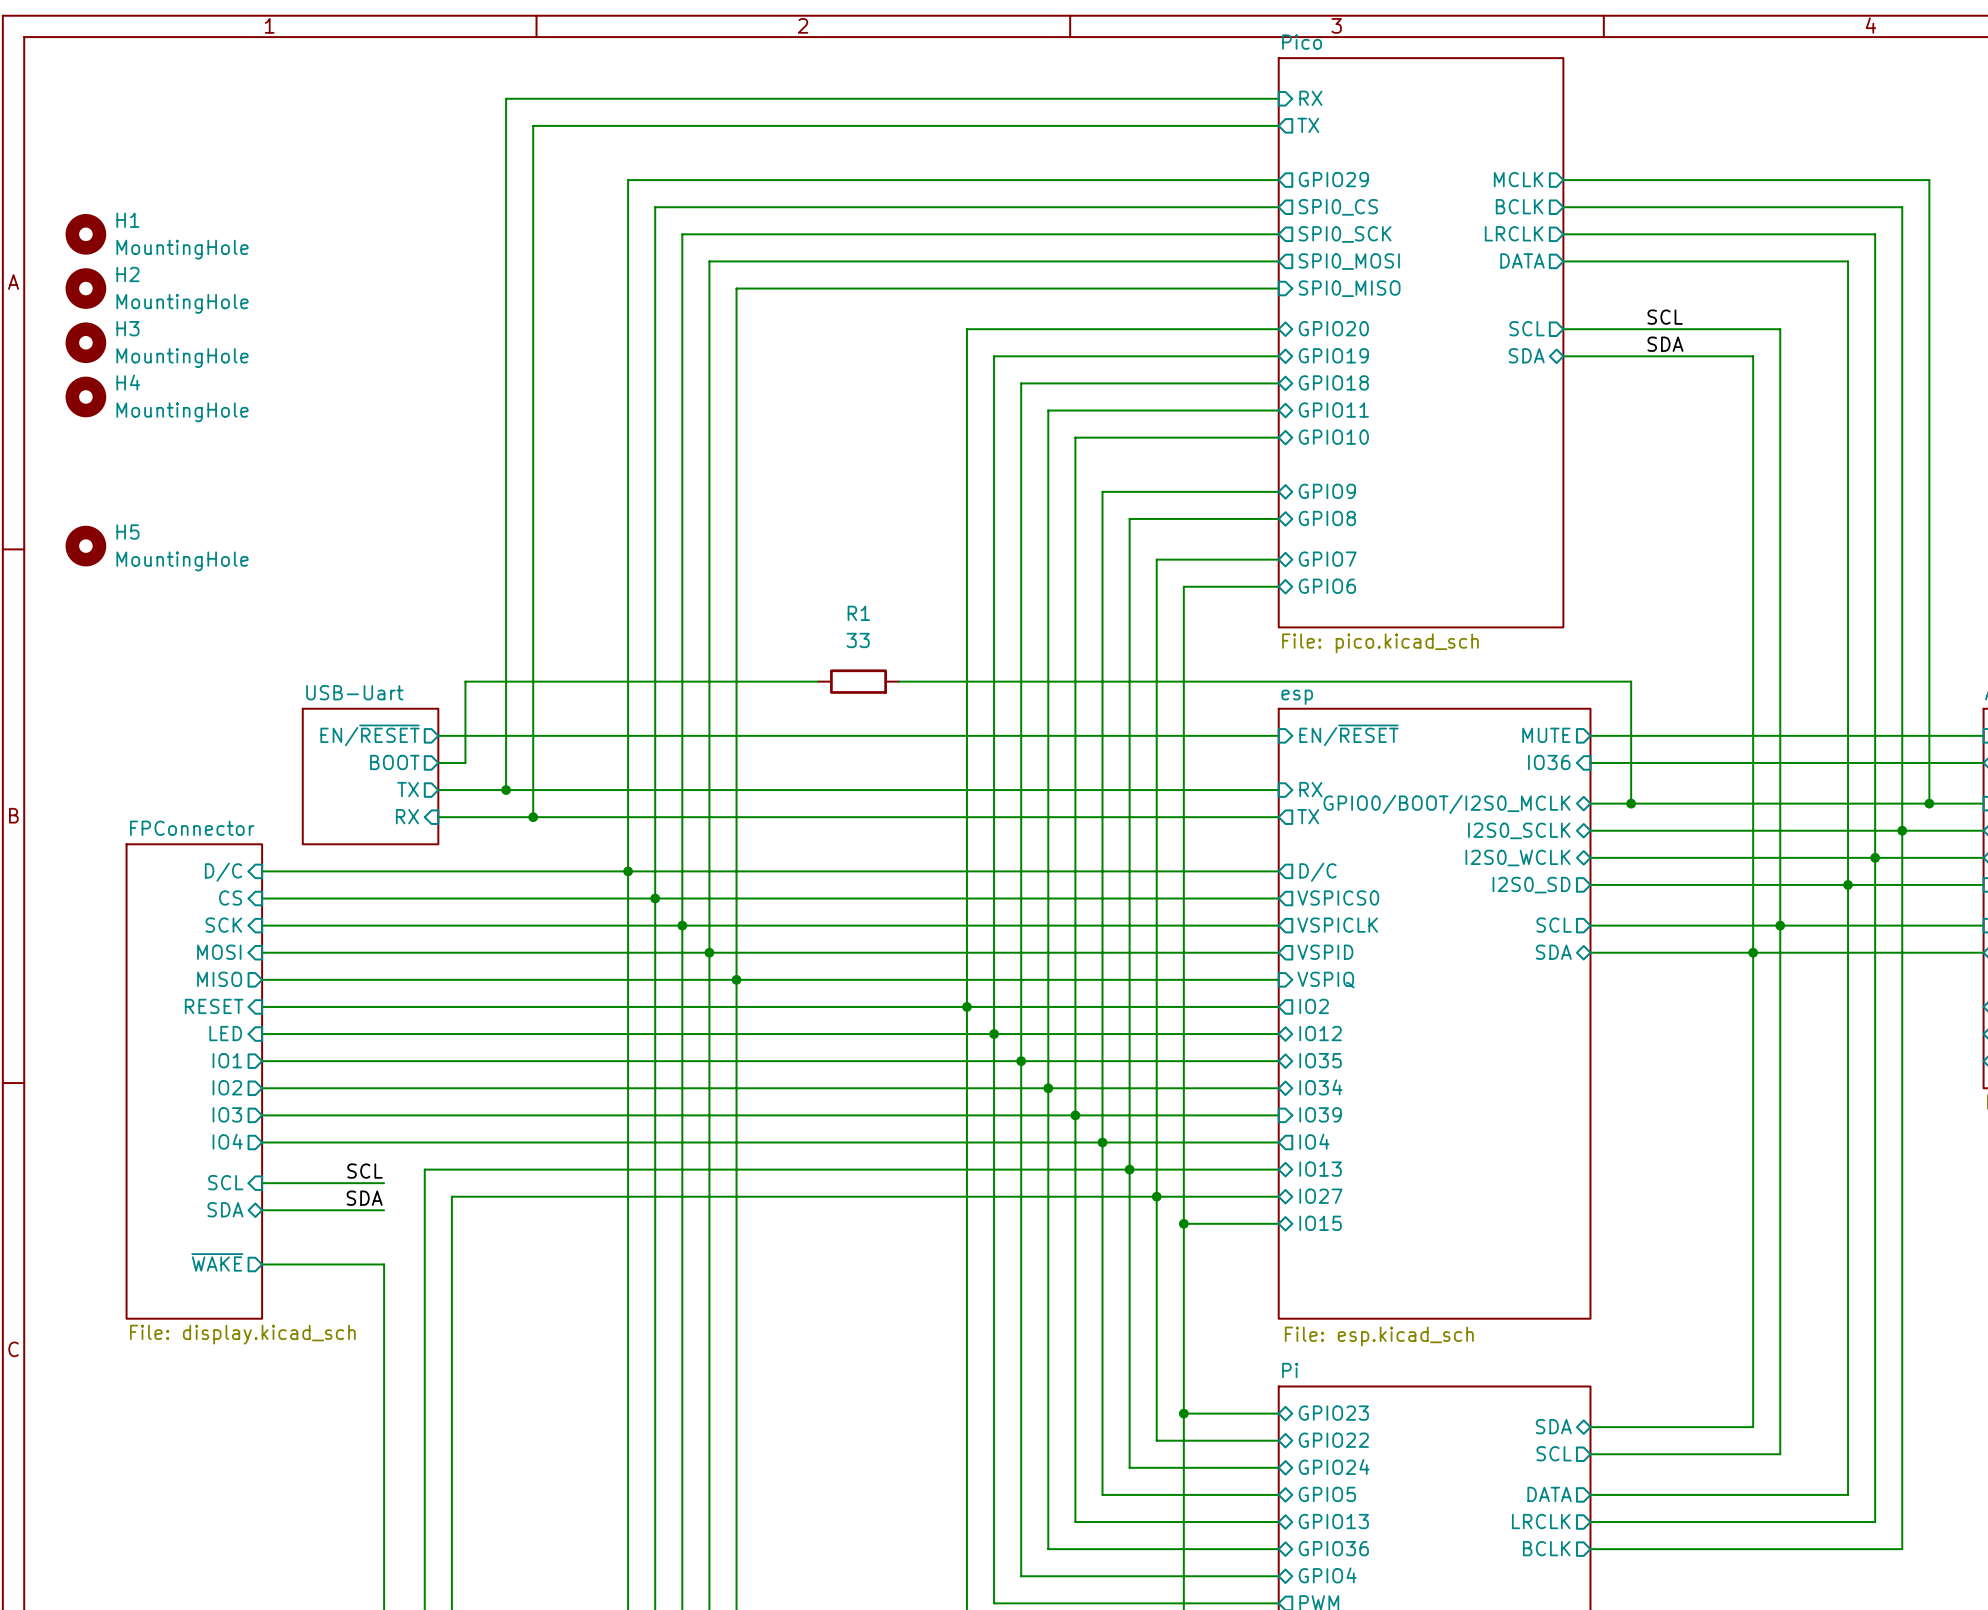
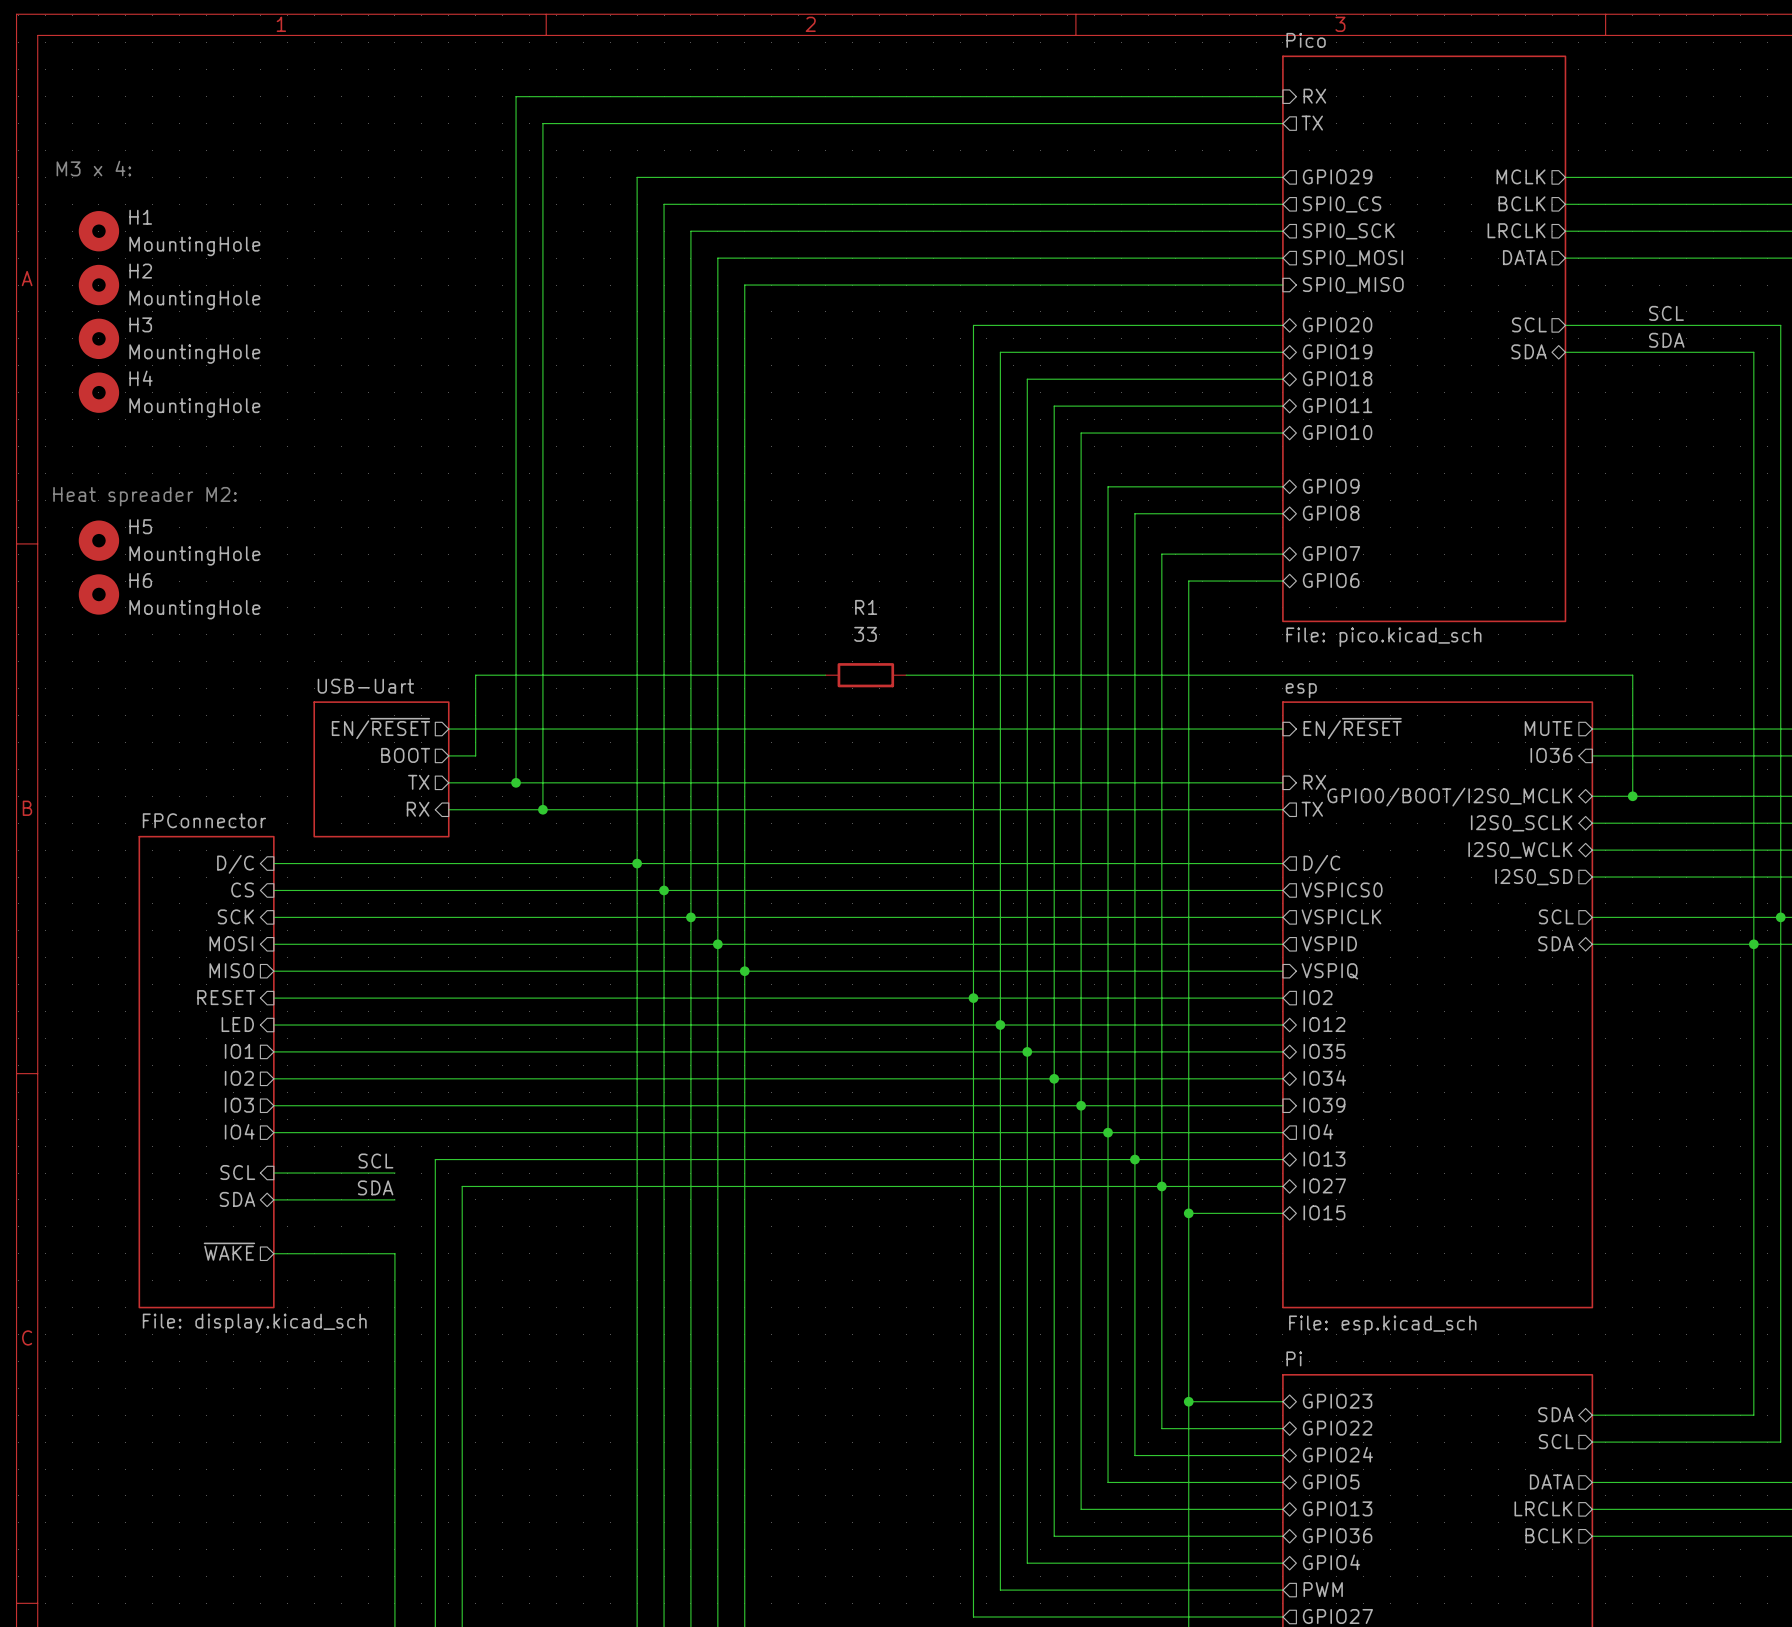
text: none -> M3 x 4: (93, 168)
text: none -> Heat spreader M2: (145, 496)
H6: none -> MountingHole (98, 594)

